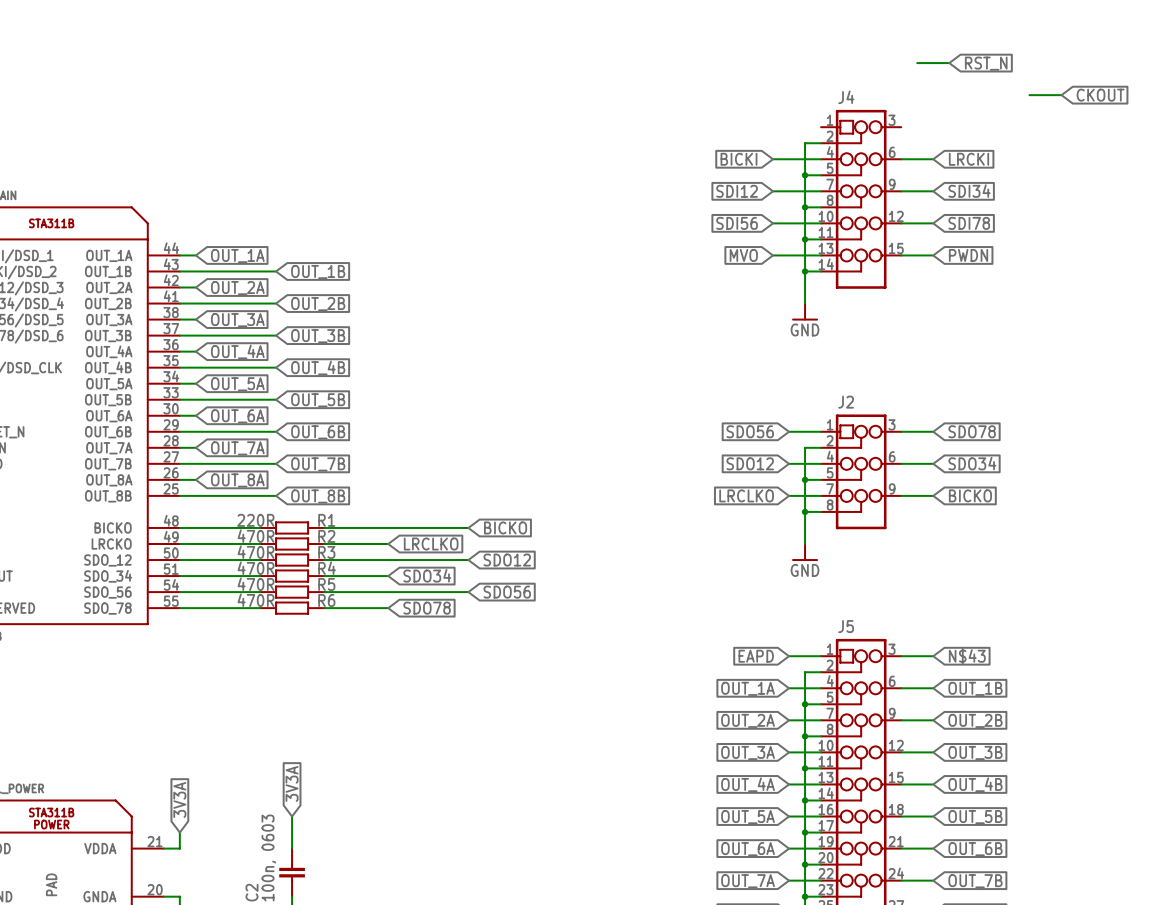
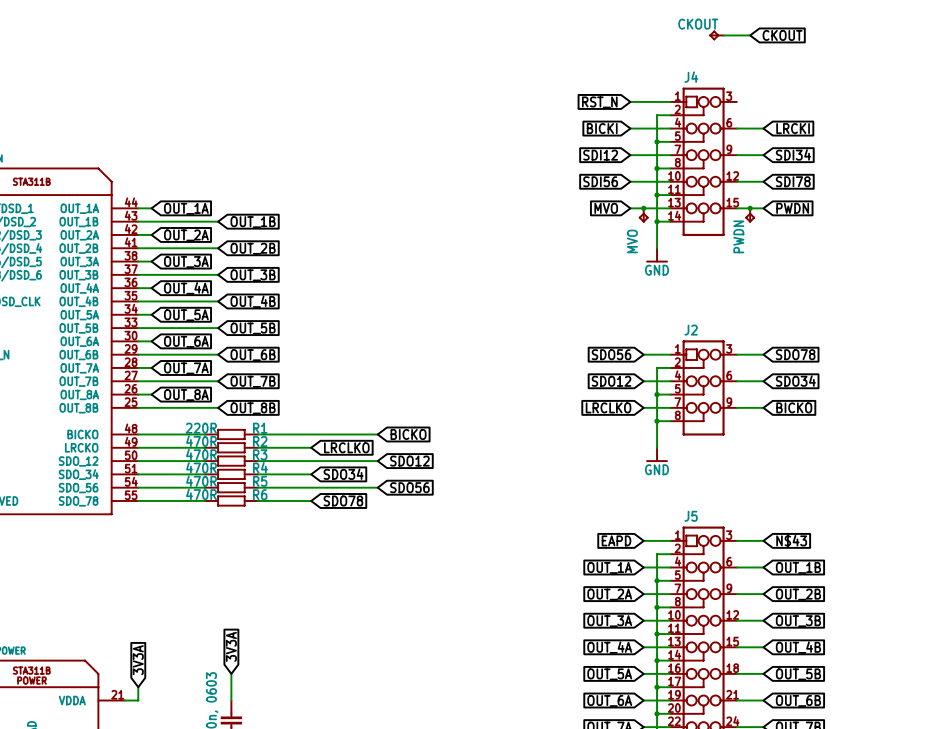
CKOUT: none -> (716, 35)
wire: (917, 63) (949, 63) -> (723, 35) (750, 35)
global label: RST_N (986, 63) -> none
wire: (1029, 95) (1061, 95) -> none
global label position: CKOUT (1100, 95) -> CKOUT (782, 35)
global label: none -> RST_N (599, 102)
wire: none -> (630, 101) (670, 101)
junction: none -> (643, 208)
junction: none -> (750, 208)
MVO: none -> (643, 215)
PWDN: none -> (750, 215)

